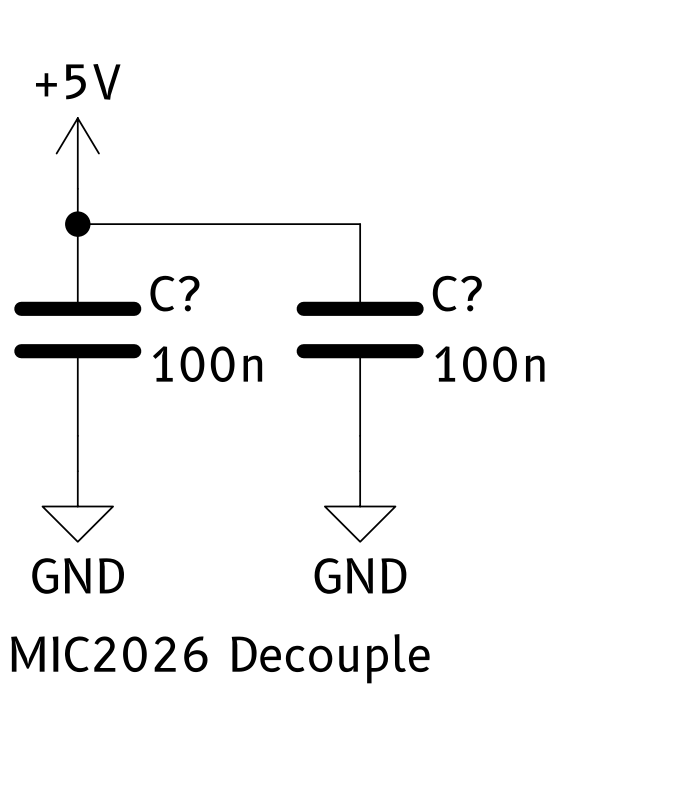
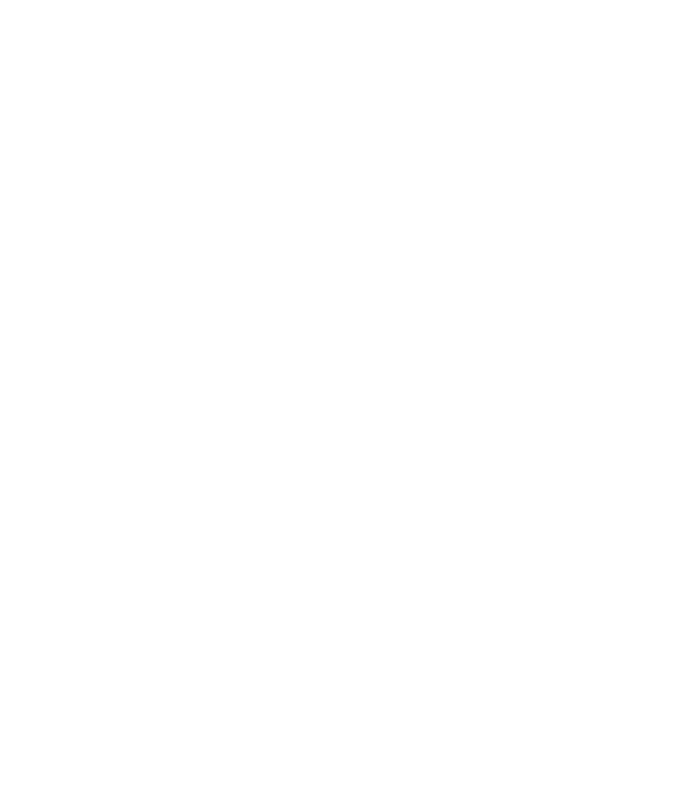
power symbol: +5V (77, 153) -> none
wire: (77, 188) (77, 224) (360, 224) -> none
junction: (77, 224) -> none
C?: 100n (77, 330) -> none
C?: 100n (360, 330) -> none
wire: (77, 435) (77, 471) -> none
wire: (360, 435) (360, 471) -> none
power symbol: GND (77, 506) -> none
power symbol: GND (360, 506) -> none
text: MIC2026 Decouple (220, 658) -> none

